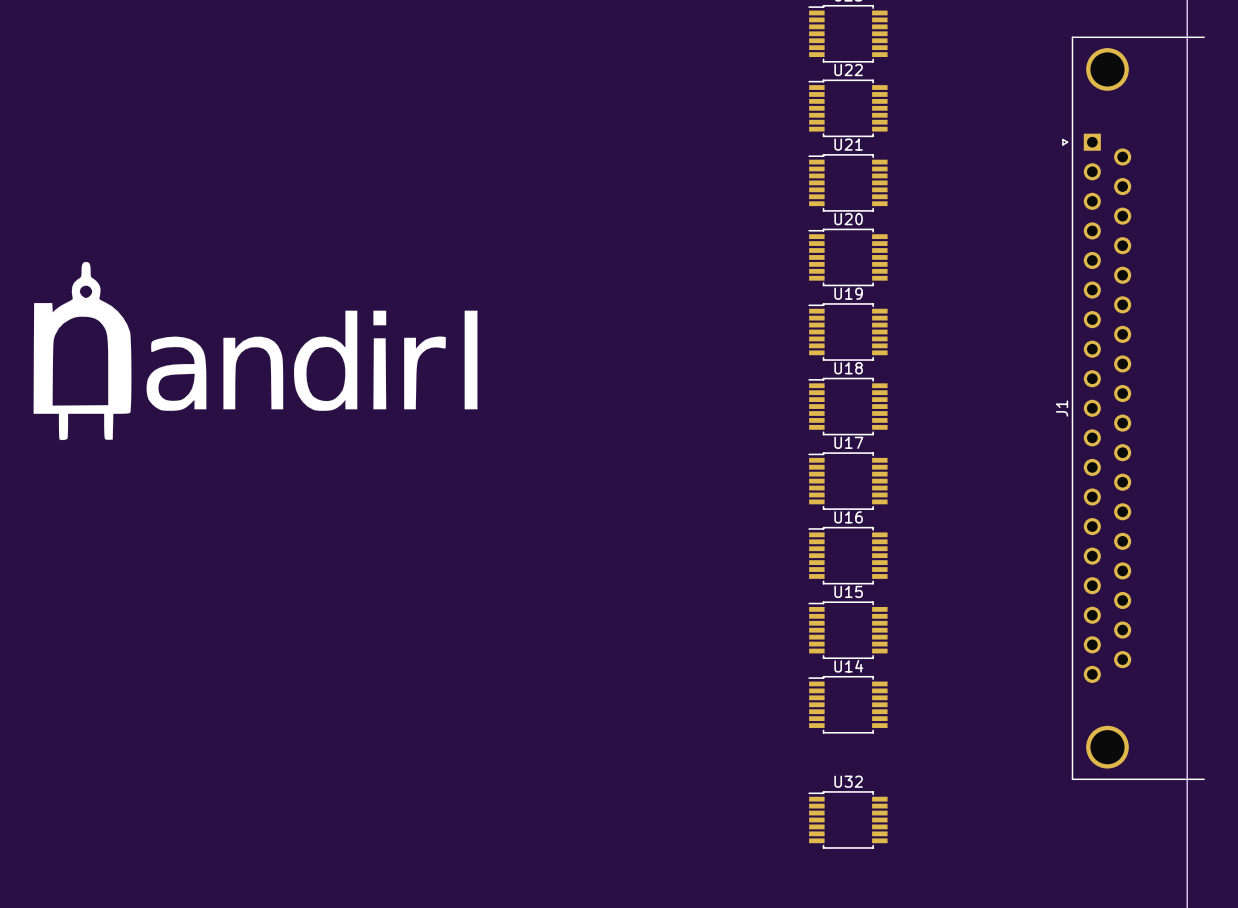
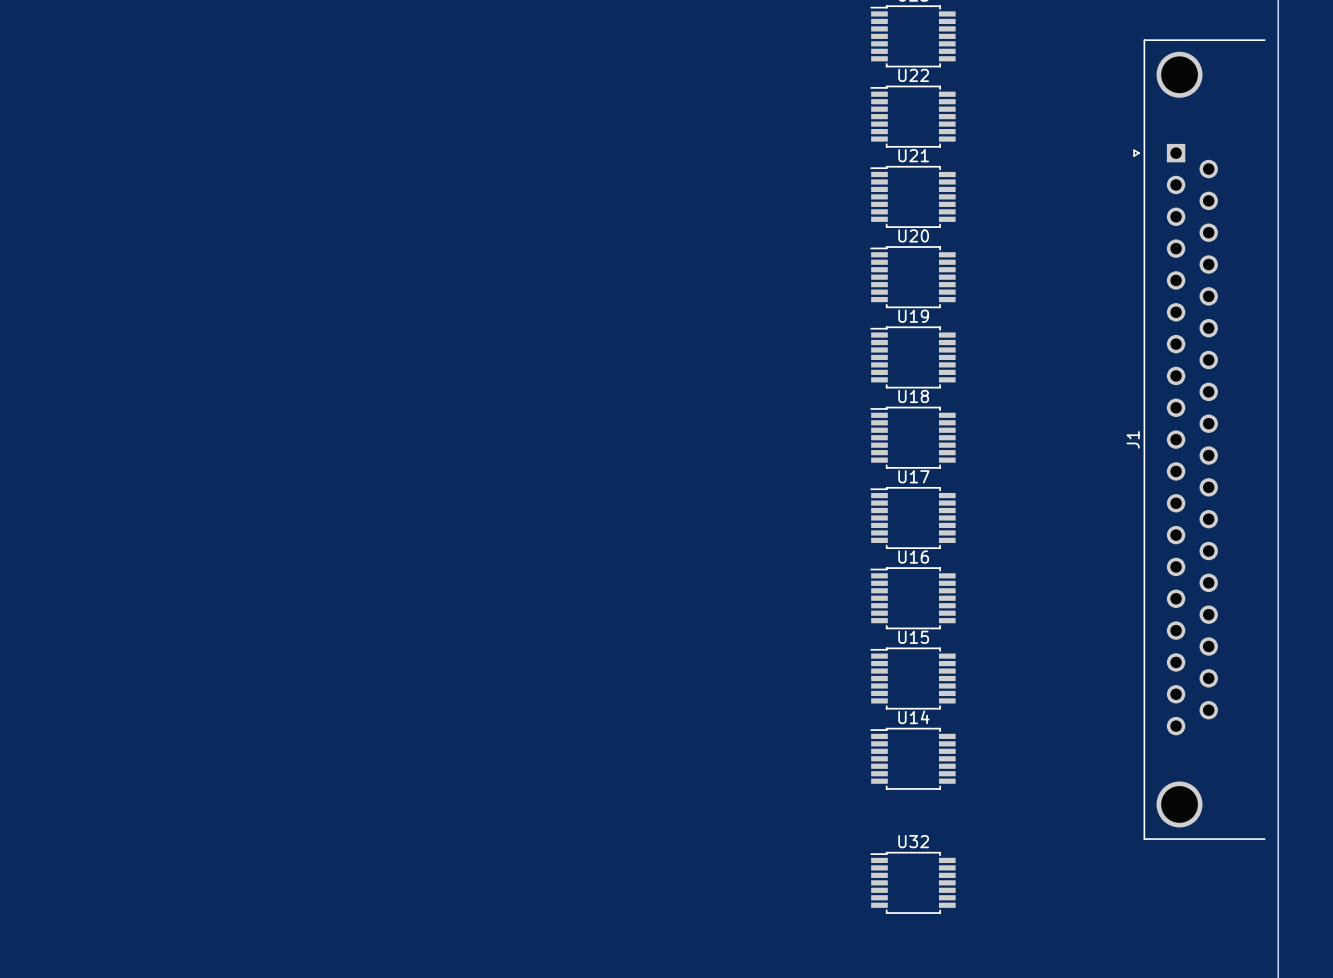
J1 footprint: [1062, 36, 1205, 780] -> [1133, 39, 1266, 840]
drawing: [33, 261, 478, 441] -> none

